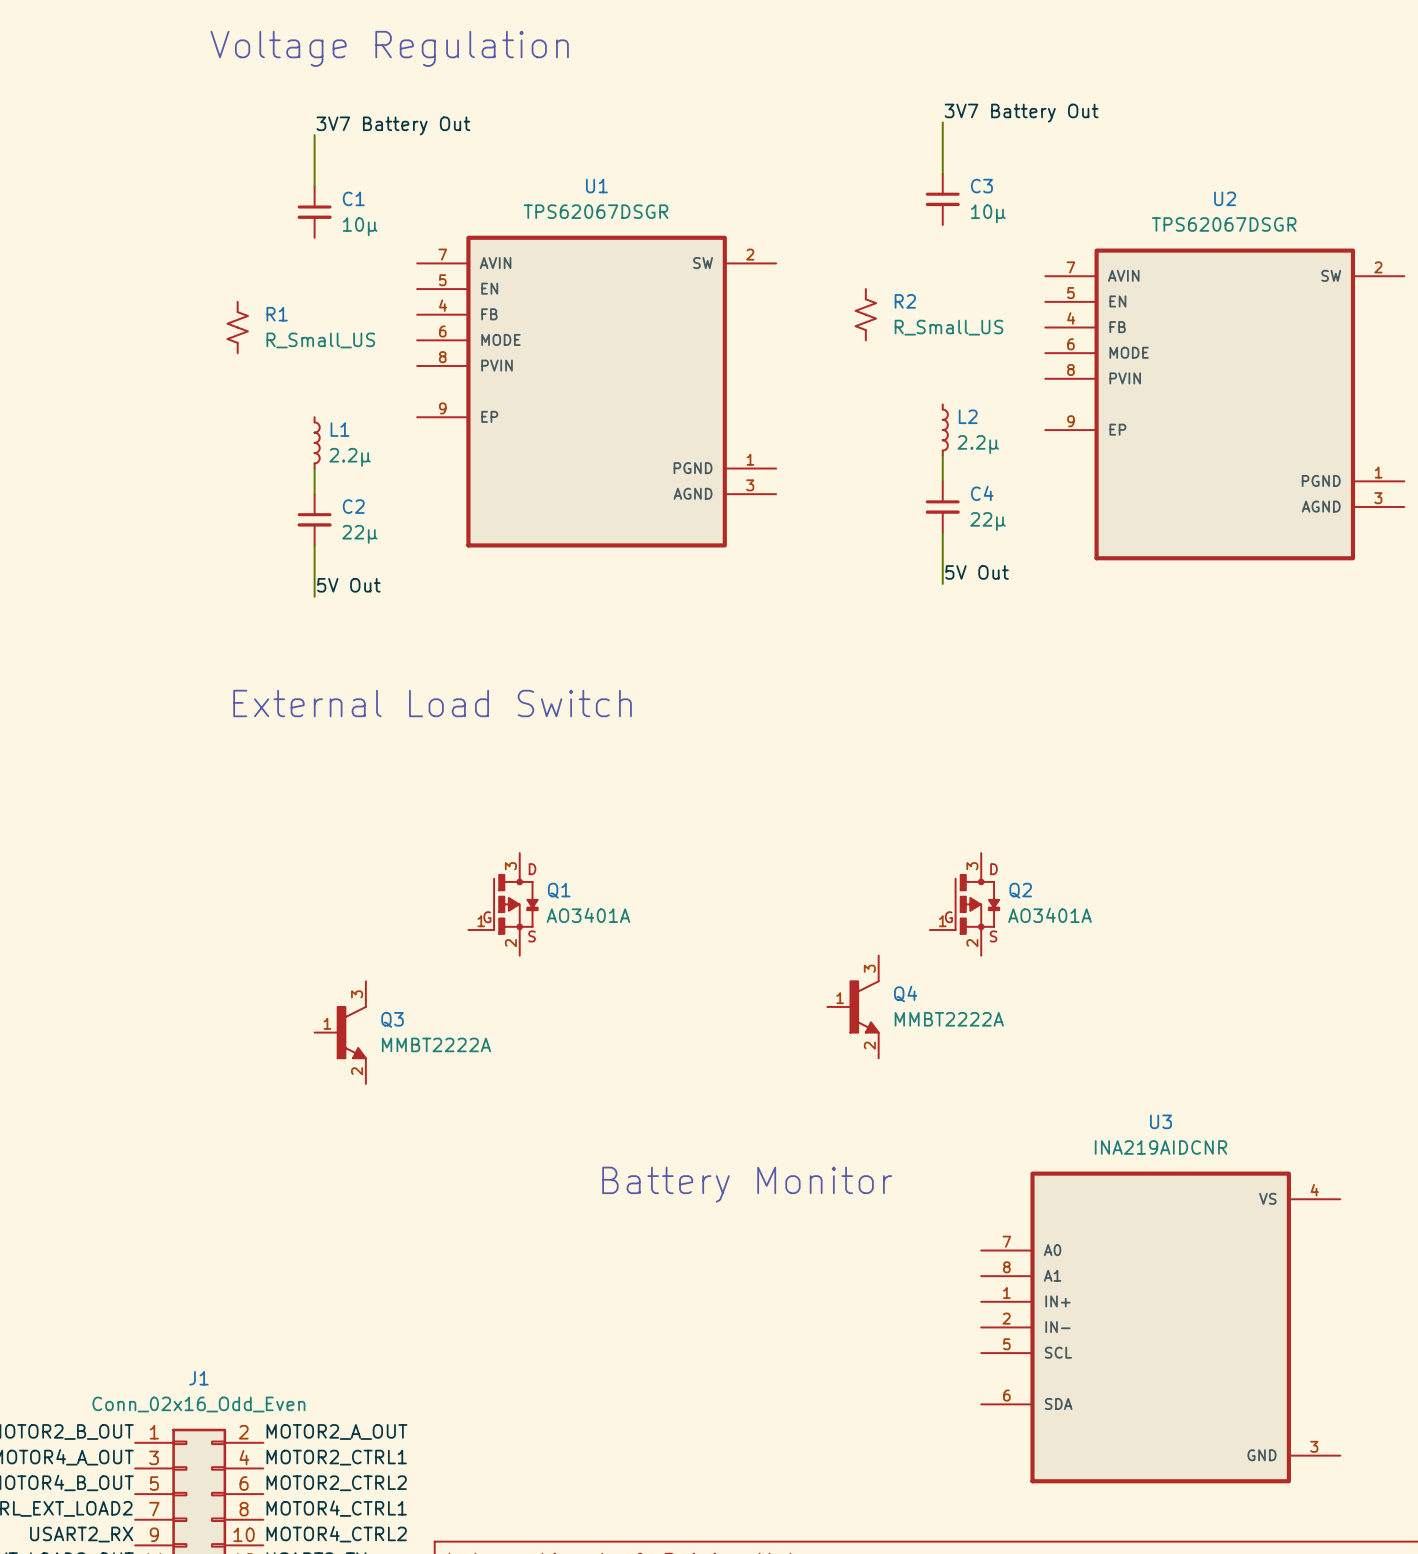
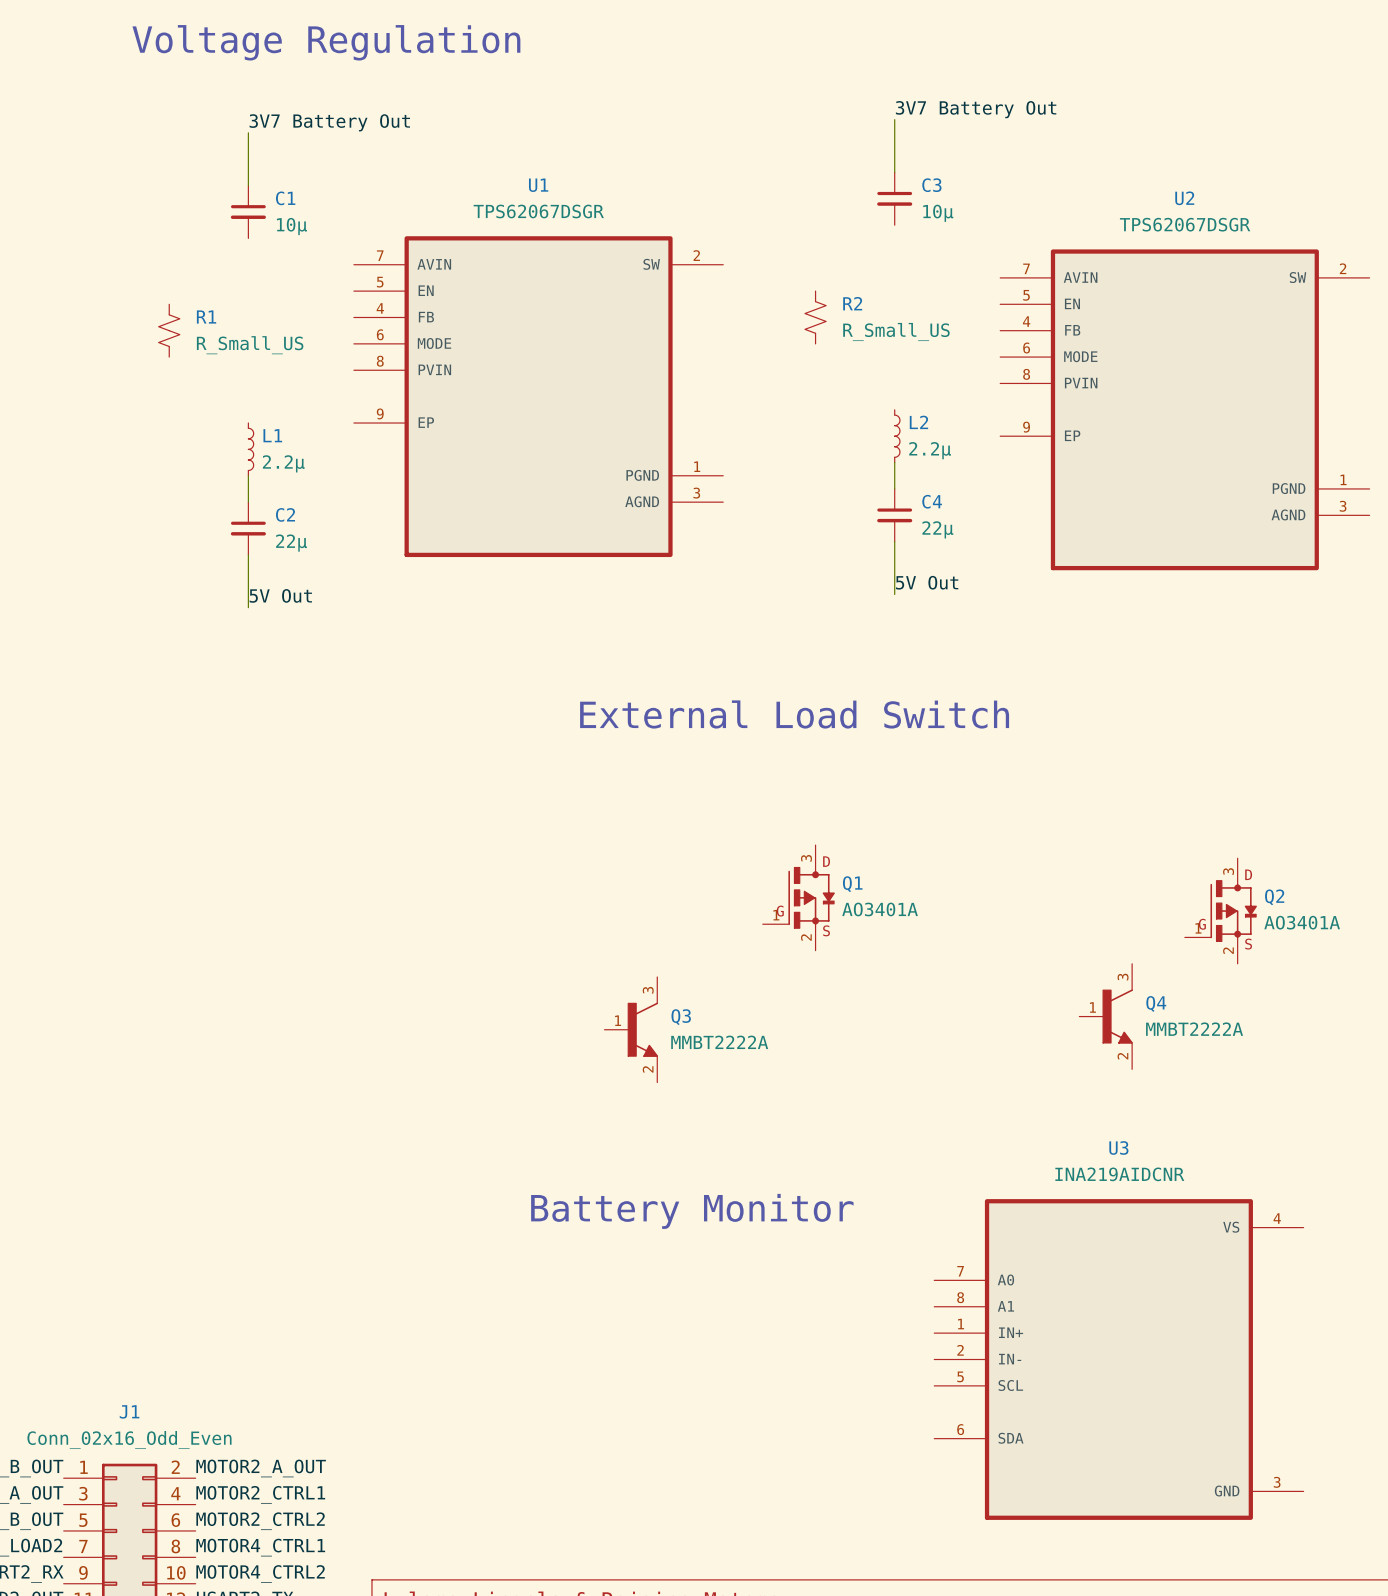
text: none -> External Load Switch (794, 714)
text: External Load Switch (432, 703) -> none
Q1 position: (503, 904) -> (798, 897)
Q2 position: (964, 904) -> (1220, 911)
Q4 position: (853, 1006) -> (1106, 1016)
Q3 position: (340, 1032) -> (631, 1029)

